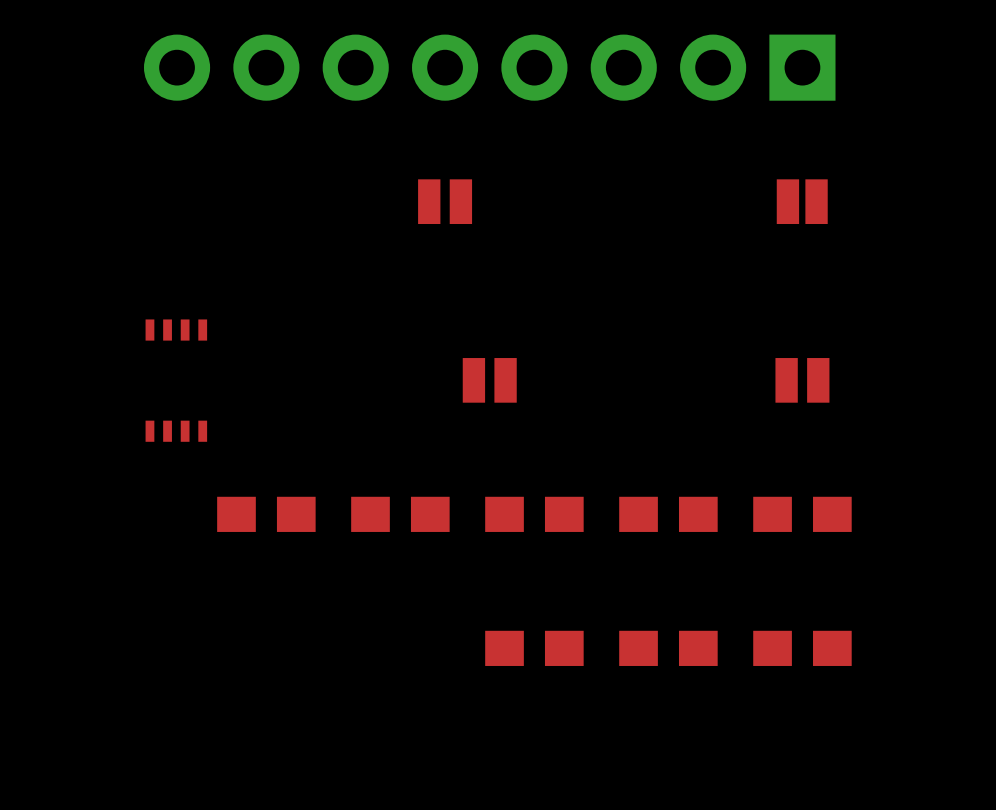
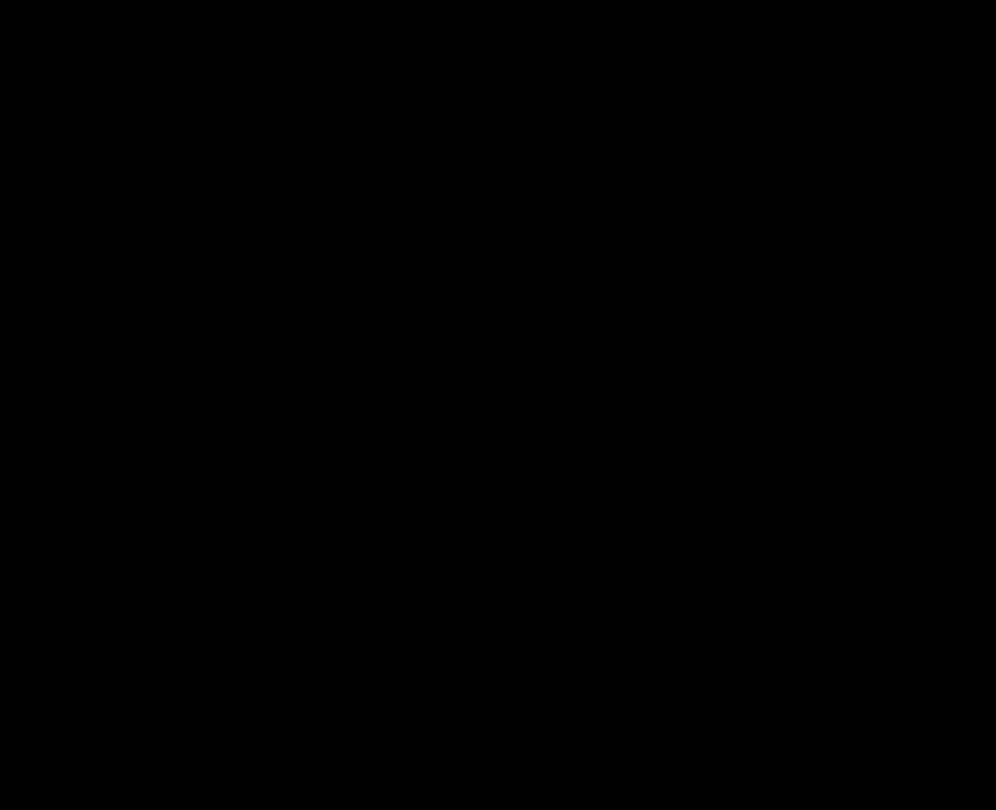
part: (489, 67) -> none
part: (445, 201) -> none
part: (802, 201) -> none
part: (176, 380) -> none
part: (489, 380) -> none
part: (802, 380) -> none
part: (266, 514) -> none
part: (400, 514) -> none
part: (534, 514) -> none
part: (668, 514) -> none
part: (802, 514) -> none
part: (534, 648) -> none
part: (668, 648) -> none
part: (802, 648) -> none

